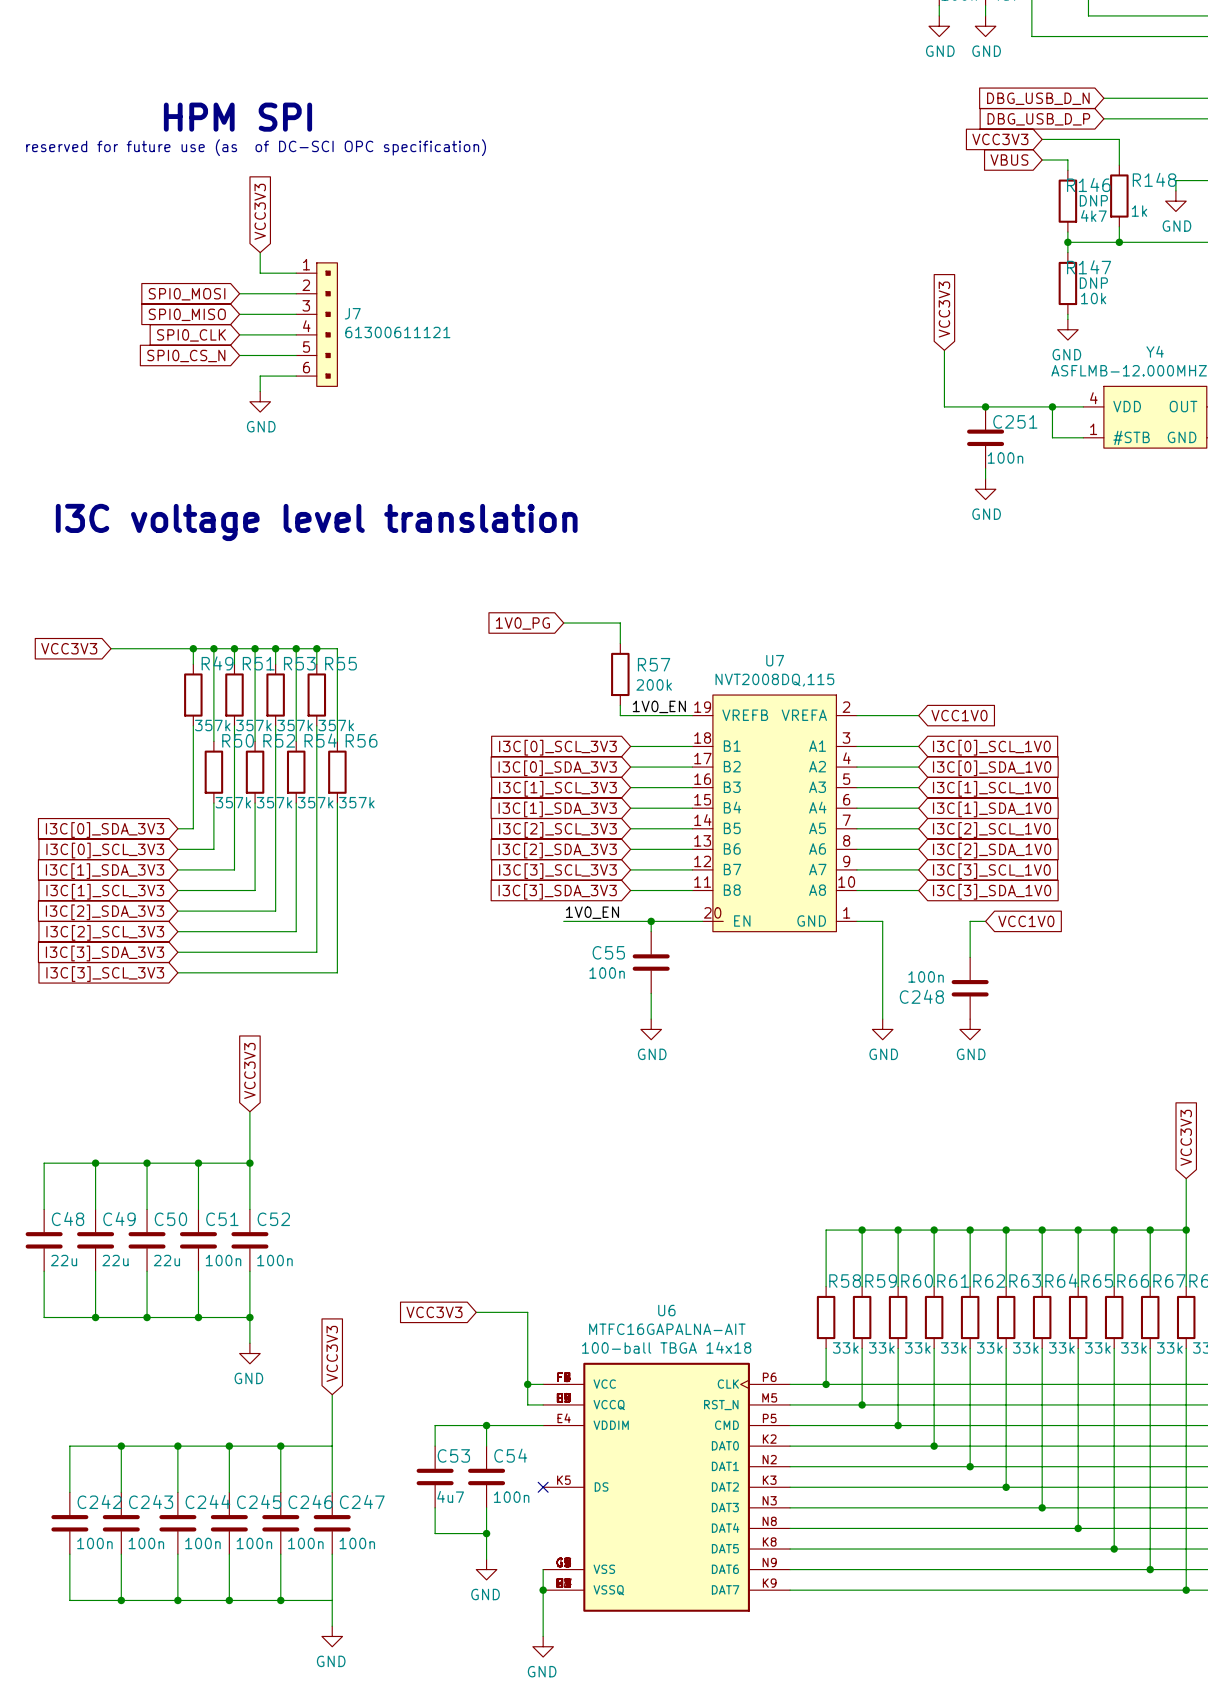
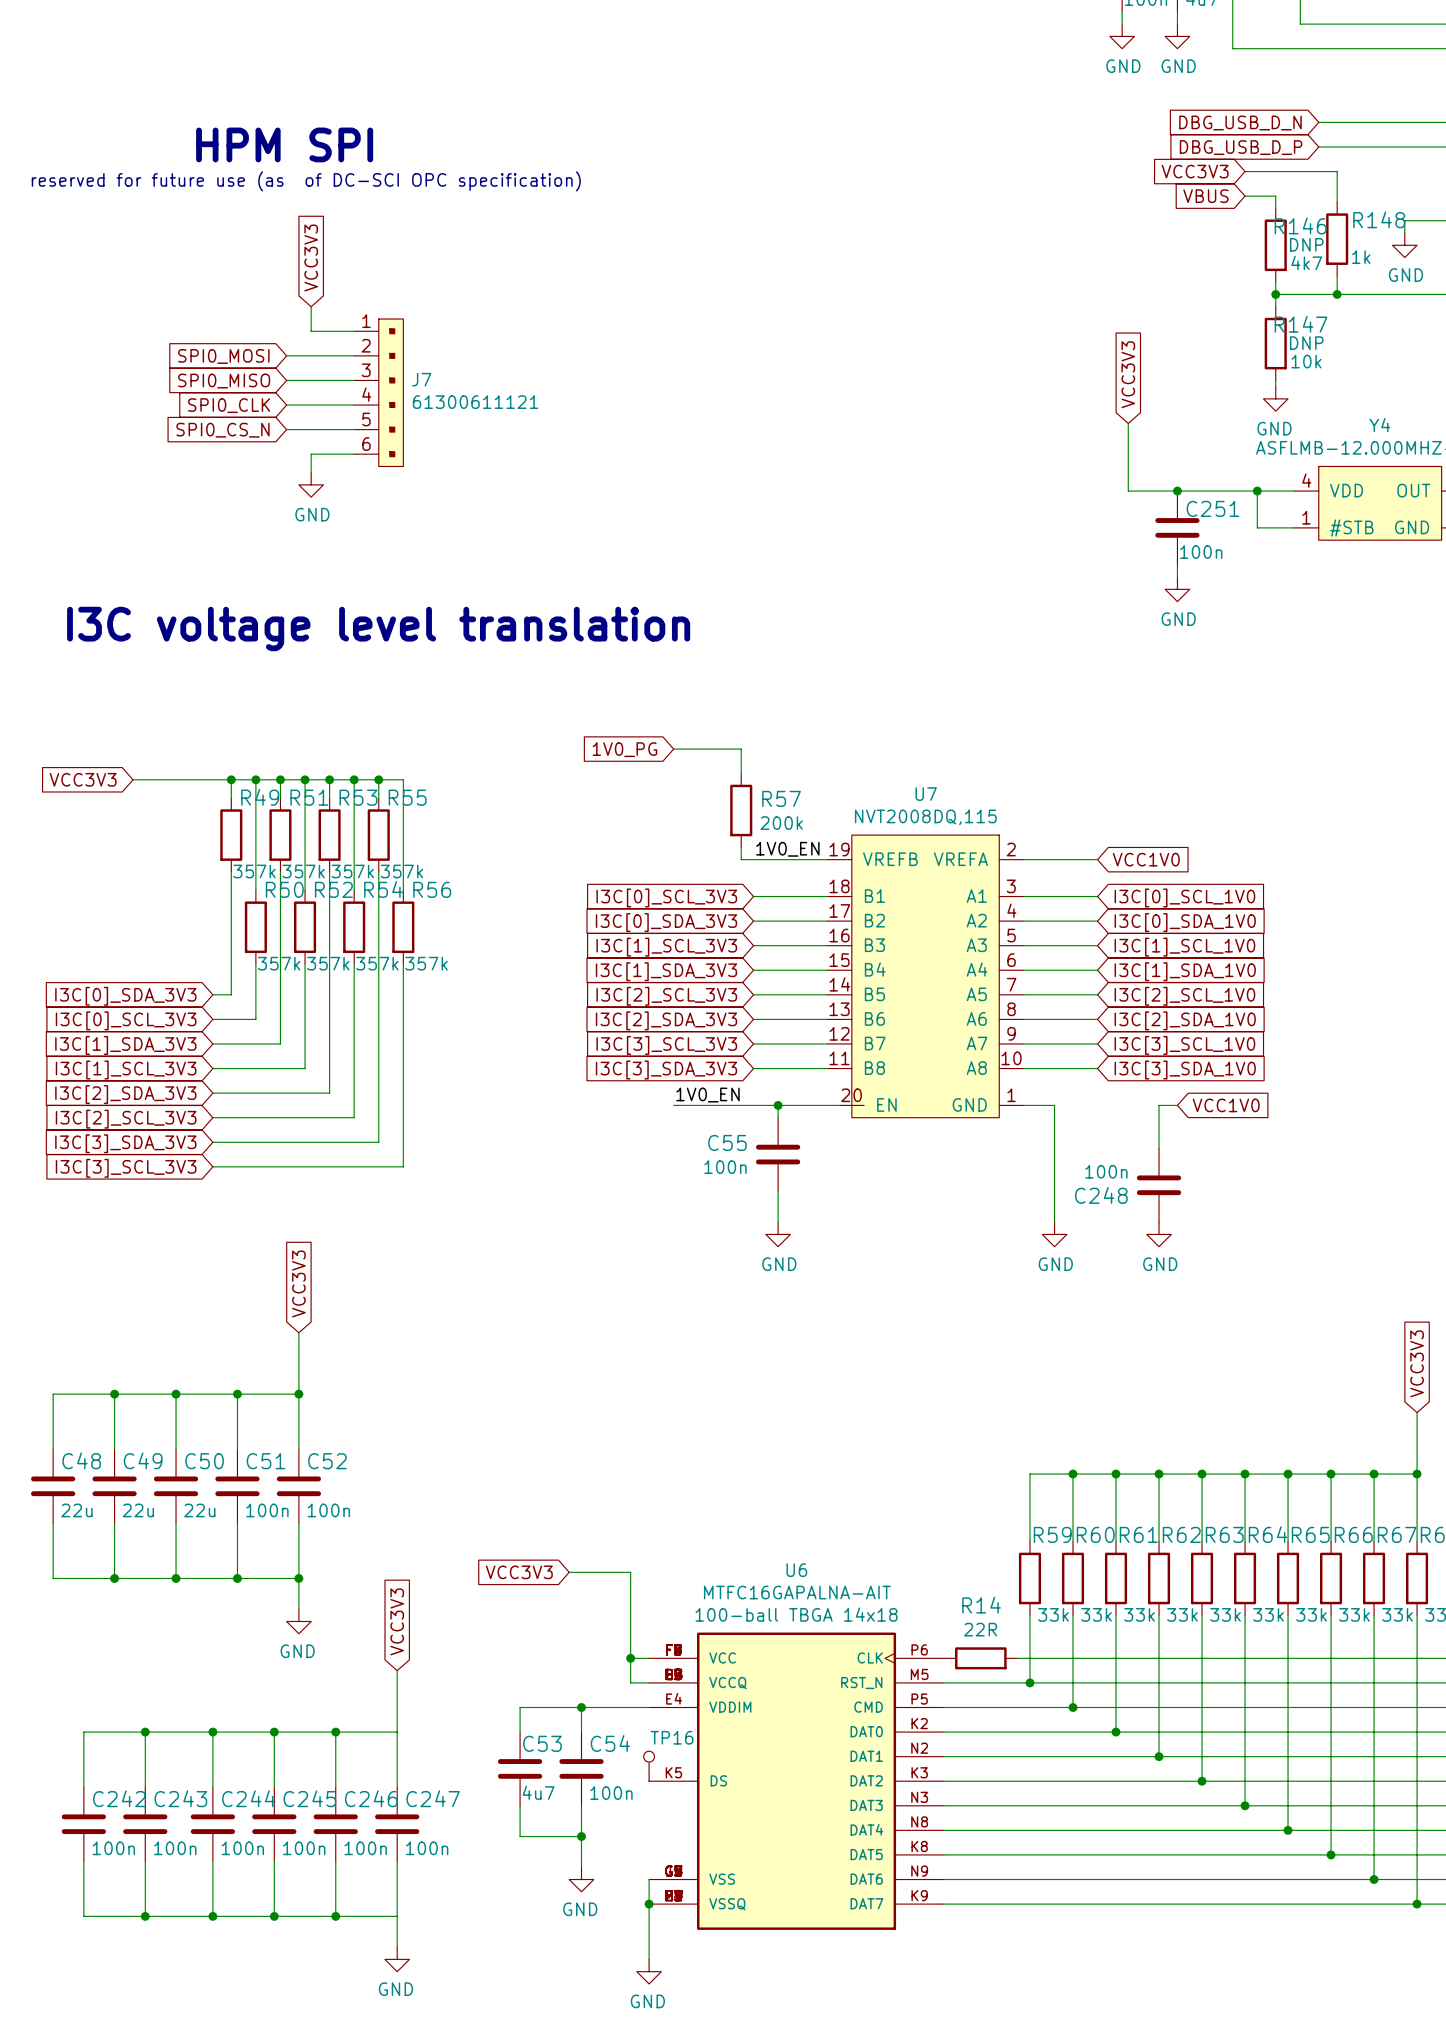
wire: (862, 1230) (826, 1230) (826, 1286) -> none
junction: (862, 1230) -> none
R58: (826, 1317) -> none
wire: (826, 1348) (826, 1384) -> none
wire: (790, 1384) (851, 1384) -> none
R14: none -> (980, 1658)
junction: (826, 1384) -> none
TP16: none -> (649, 1766)
no-connect mark: (543, 1487) -> none

